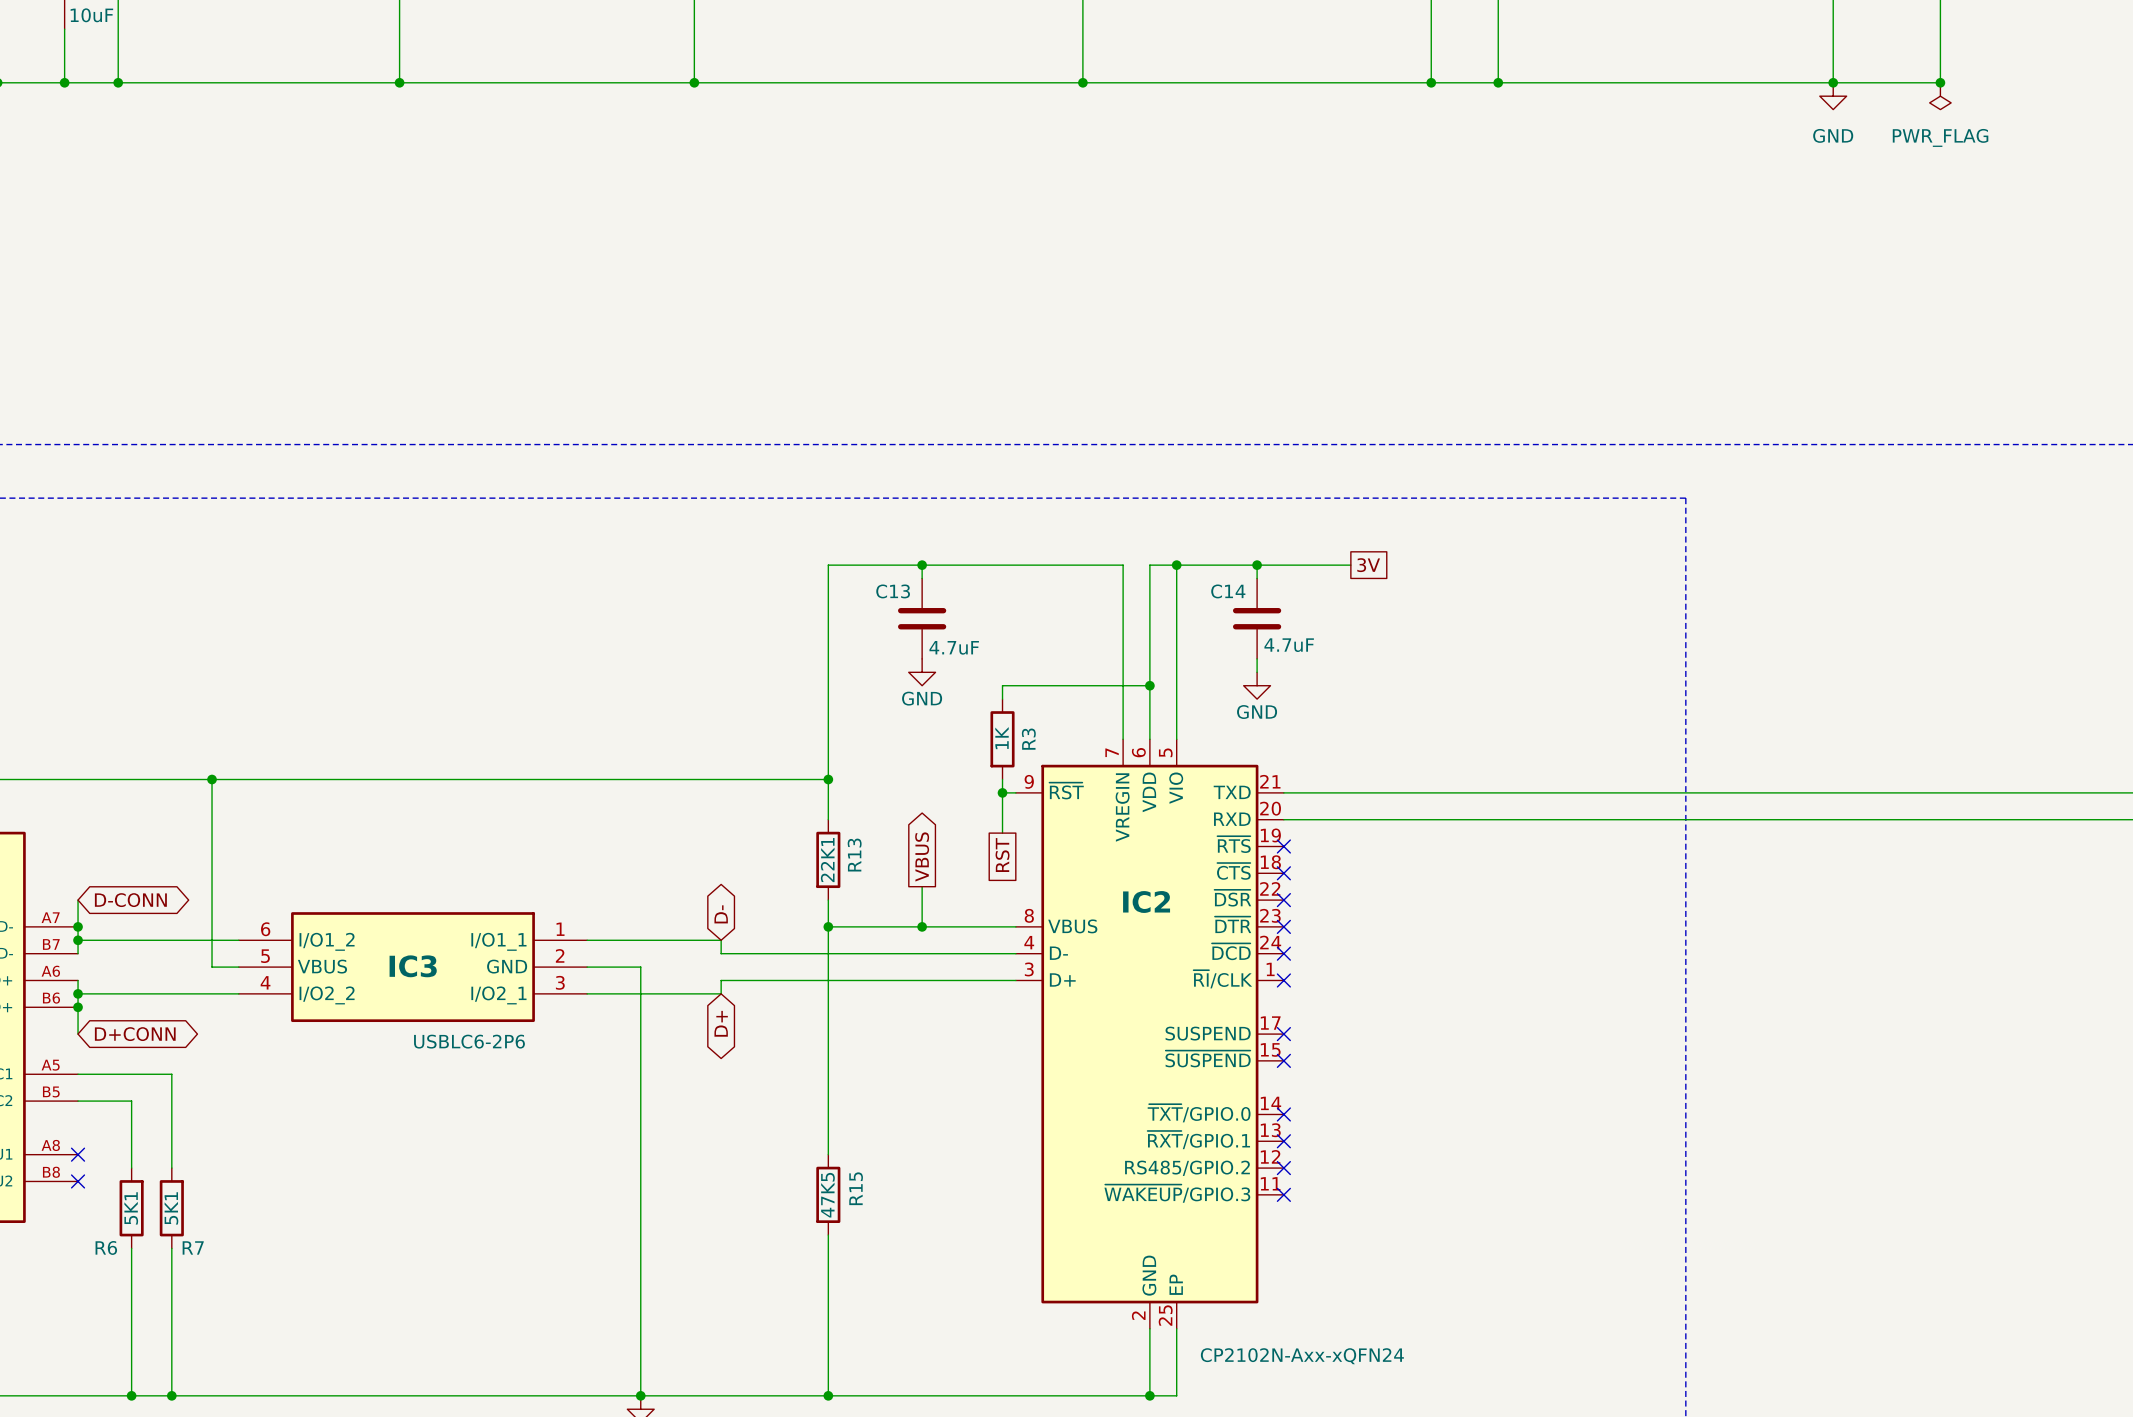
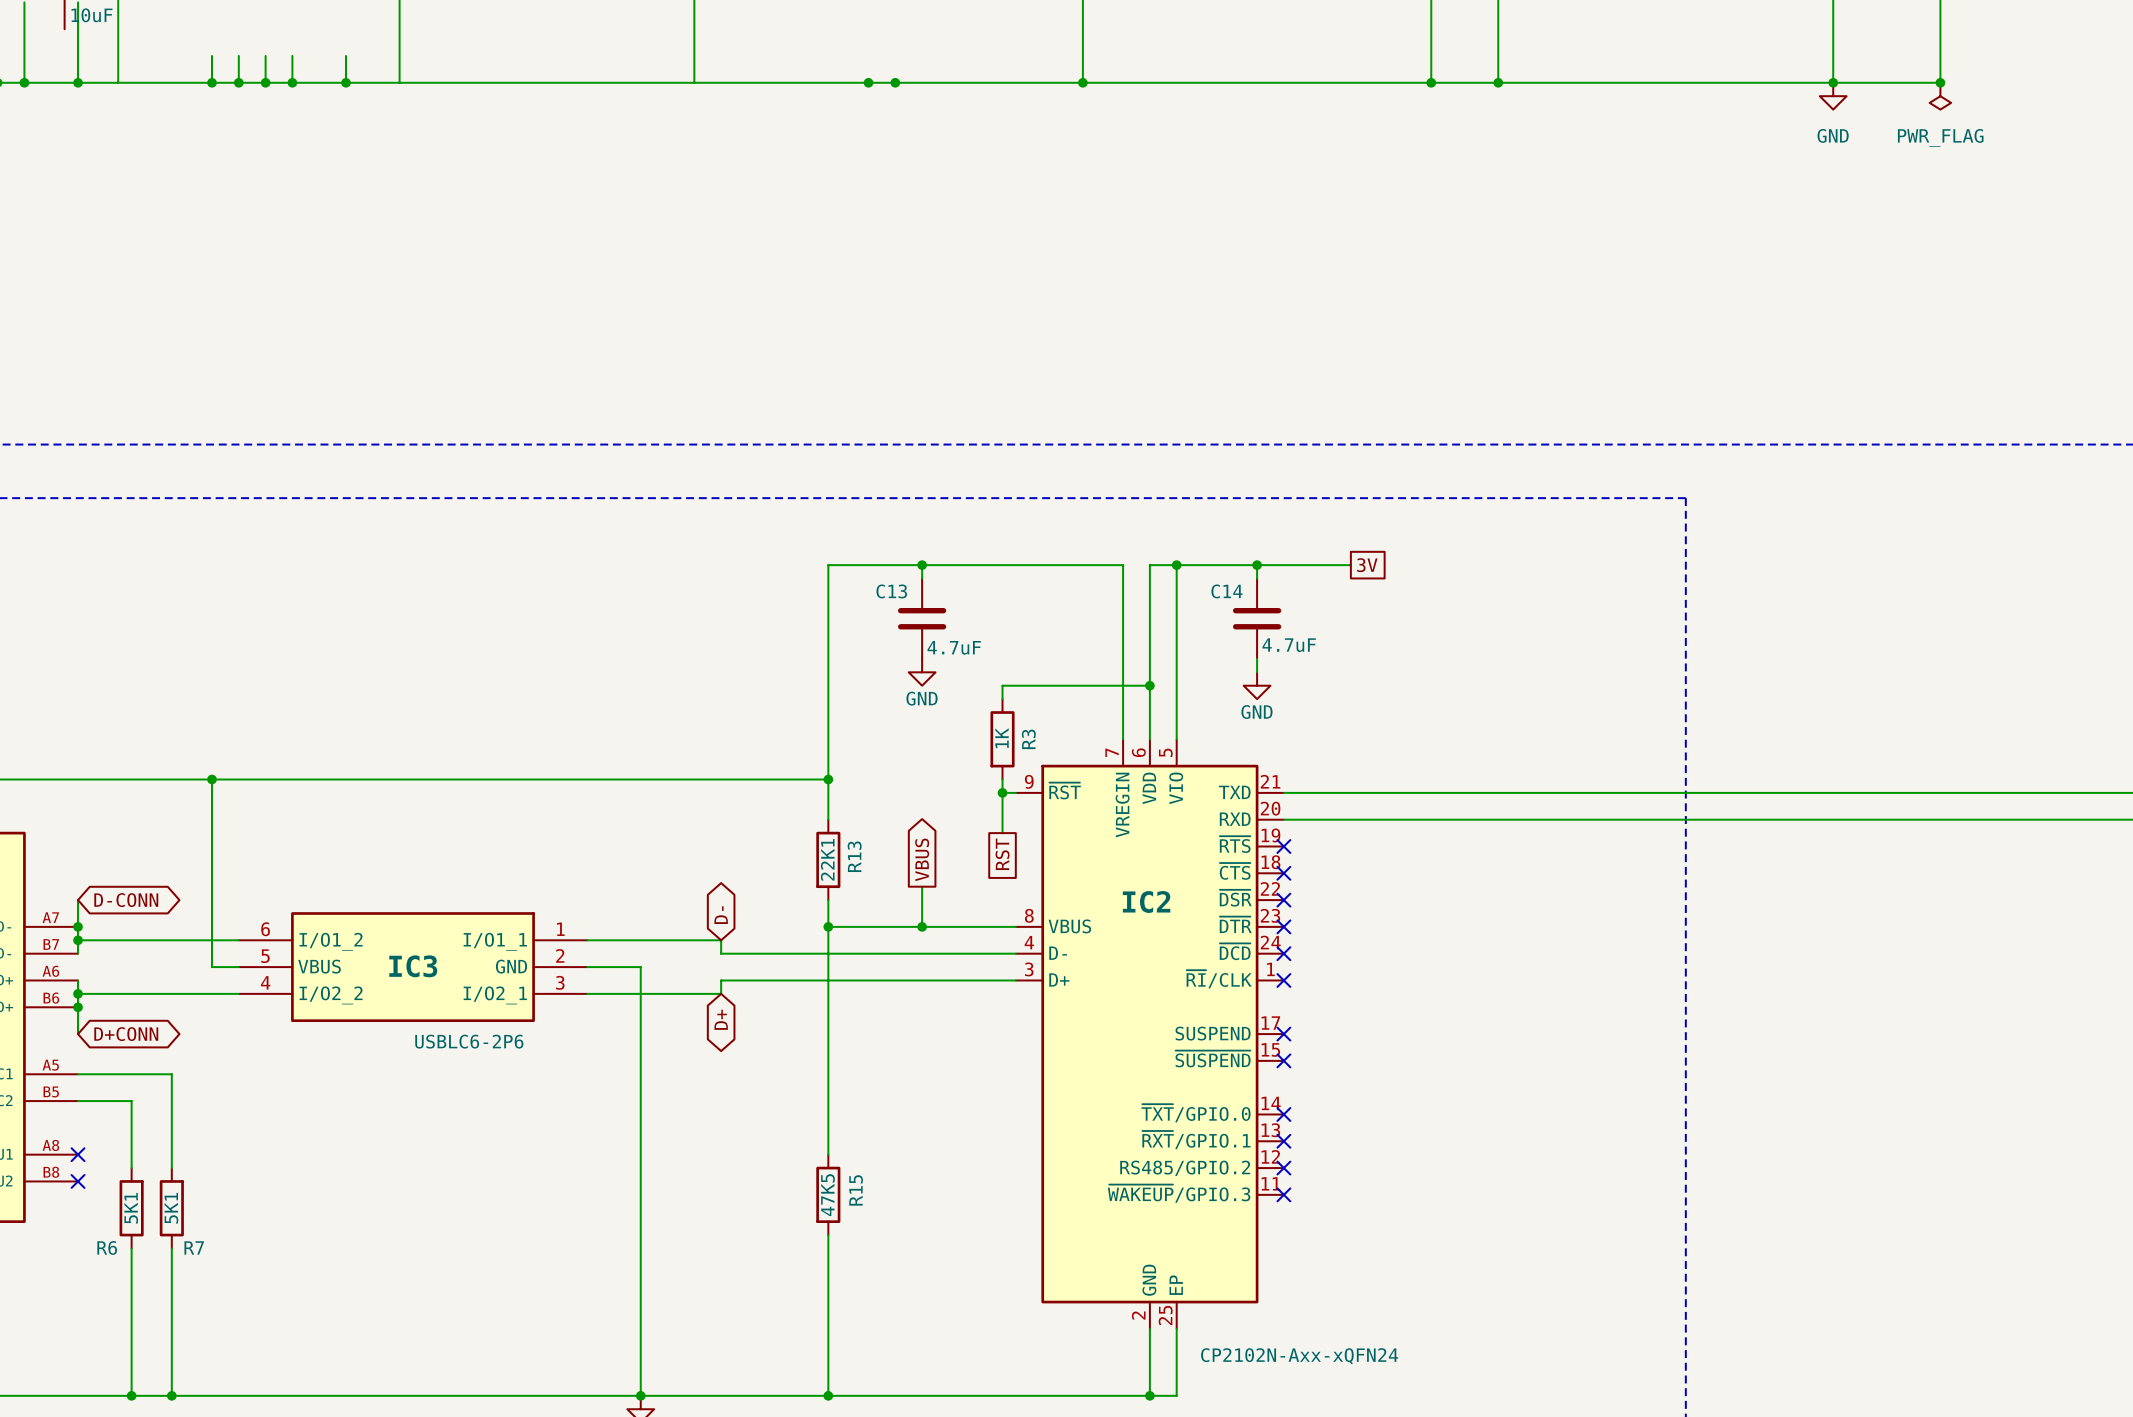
wire: none -> (24, 2) (24, 82)
wire: none -> (78, 2) (78, 82)
wire: (64, 29) (64, 82) -> none
wire: none -> (212, 55) (212, 82)
wire: none -> (238, 55) (238, 82)
wire: none -> (265, 55) (265, 82)
wire: none -> (292, 55) (292, 82)
wire: none -> (345, 55) (345, 82)
junction: none -> (24, 82)
junction position: (64, 82) -> (78, 82)
junction: (118, 82) -> none
junction: none -> (212, 82)
junction: none -> (238, 82)
junction: none -> (265, 82)
junction: none -> (292, 82)
junction: none -> (345, 82)
junction: (399, 82) -> none
junction: (694, 82) -> none
junction: none -> (868, 82)
junction: none -> (895, 82)

